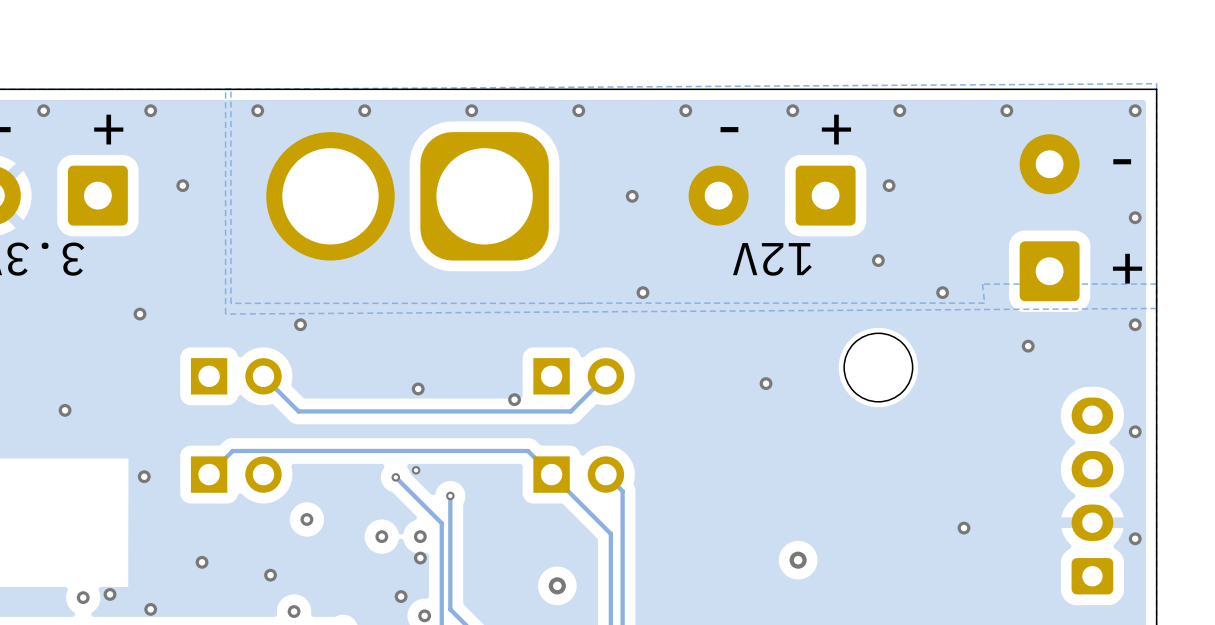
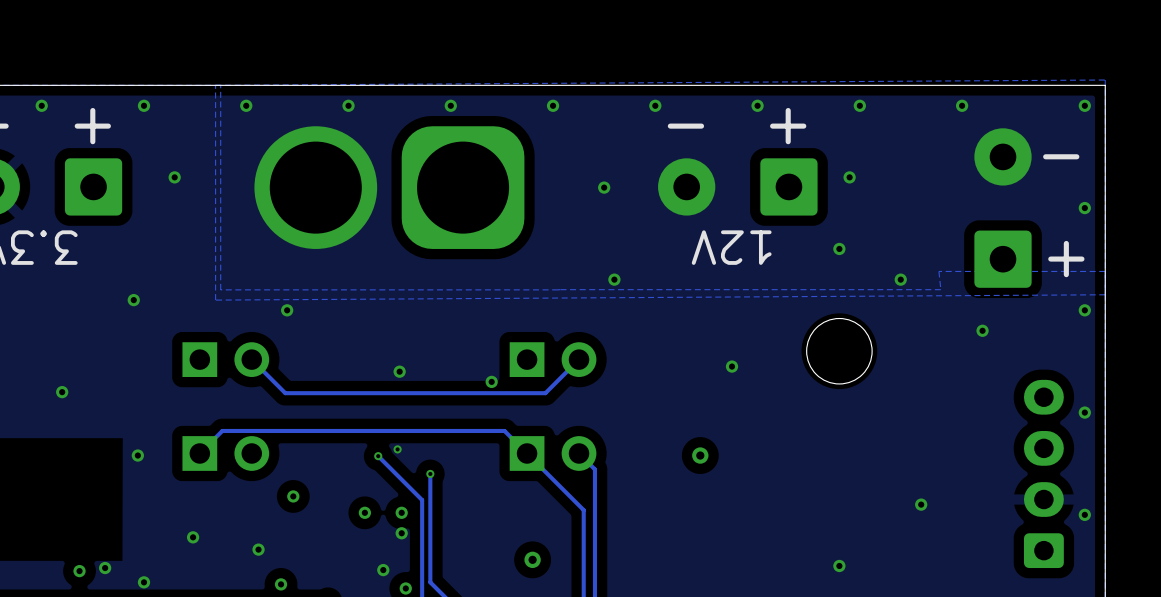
via position: (798, 560) -> (700, 455)
via: none -> (839, 565)

